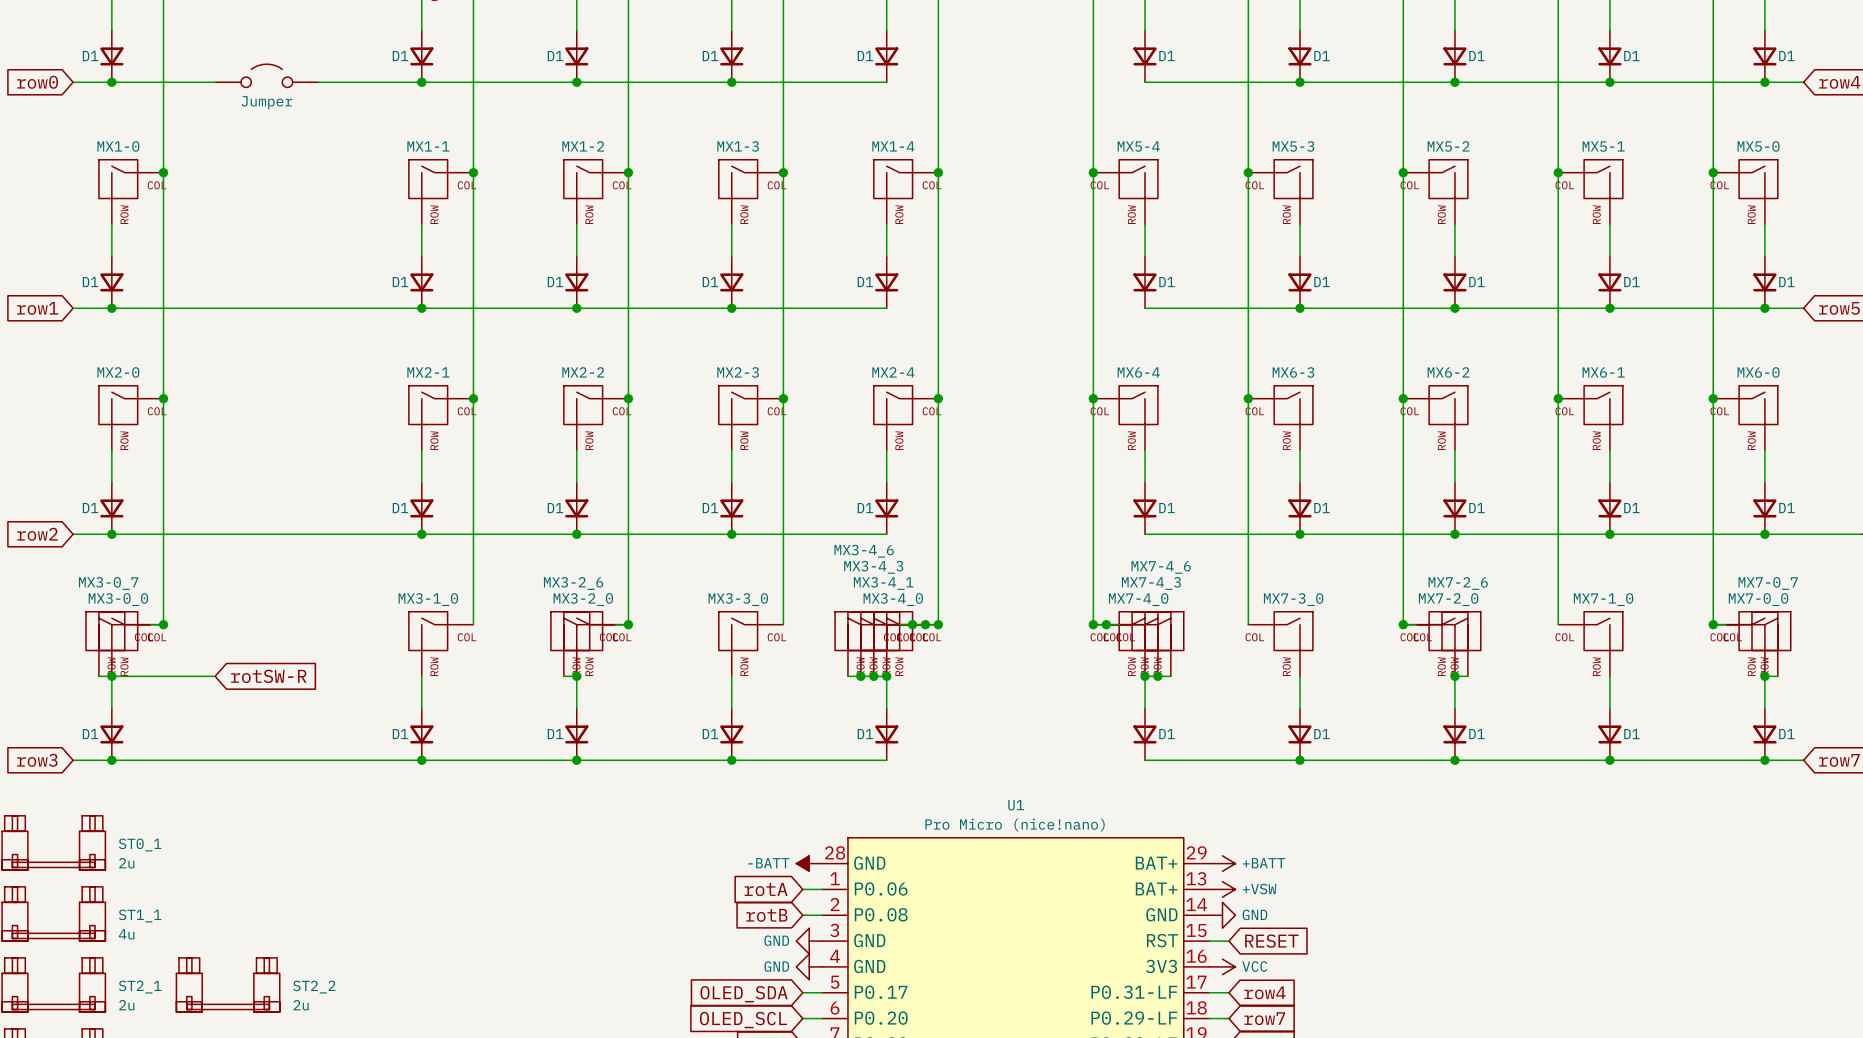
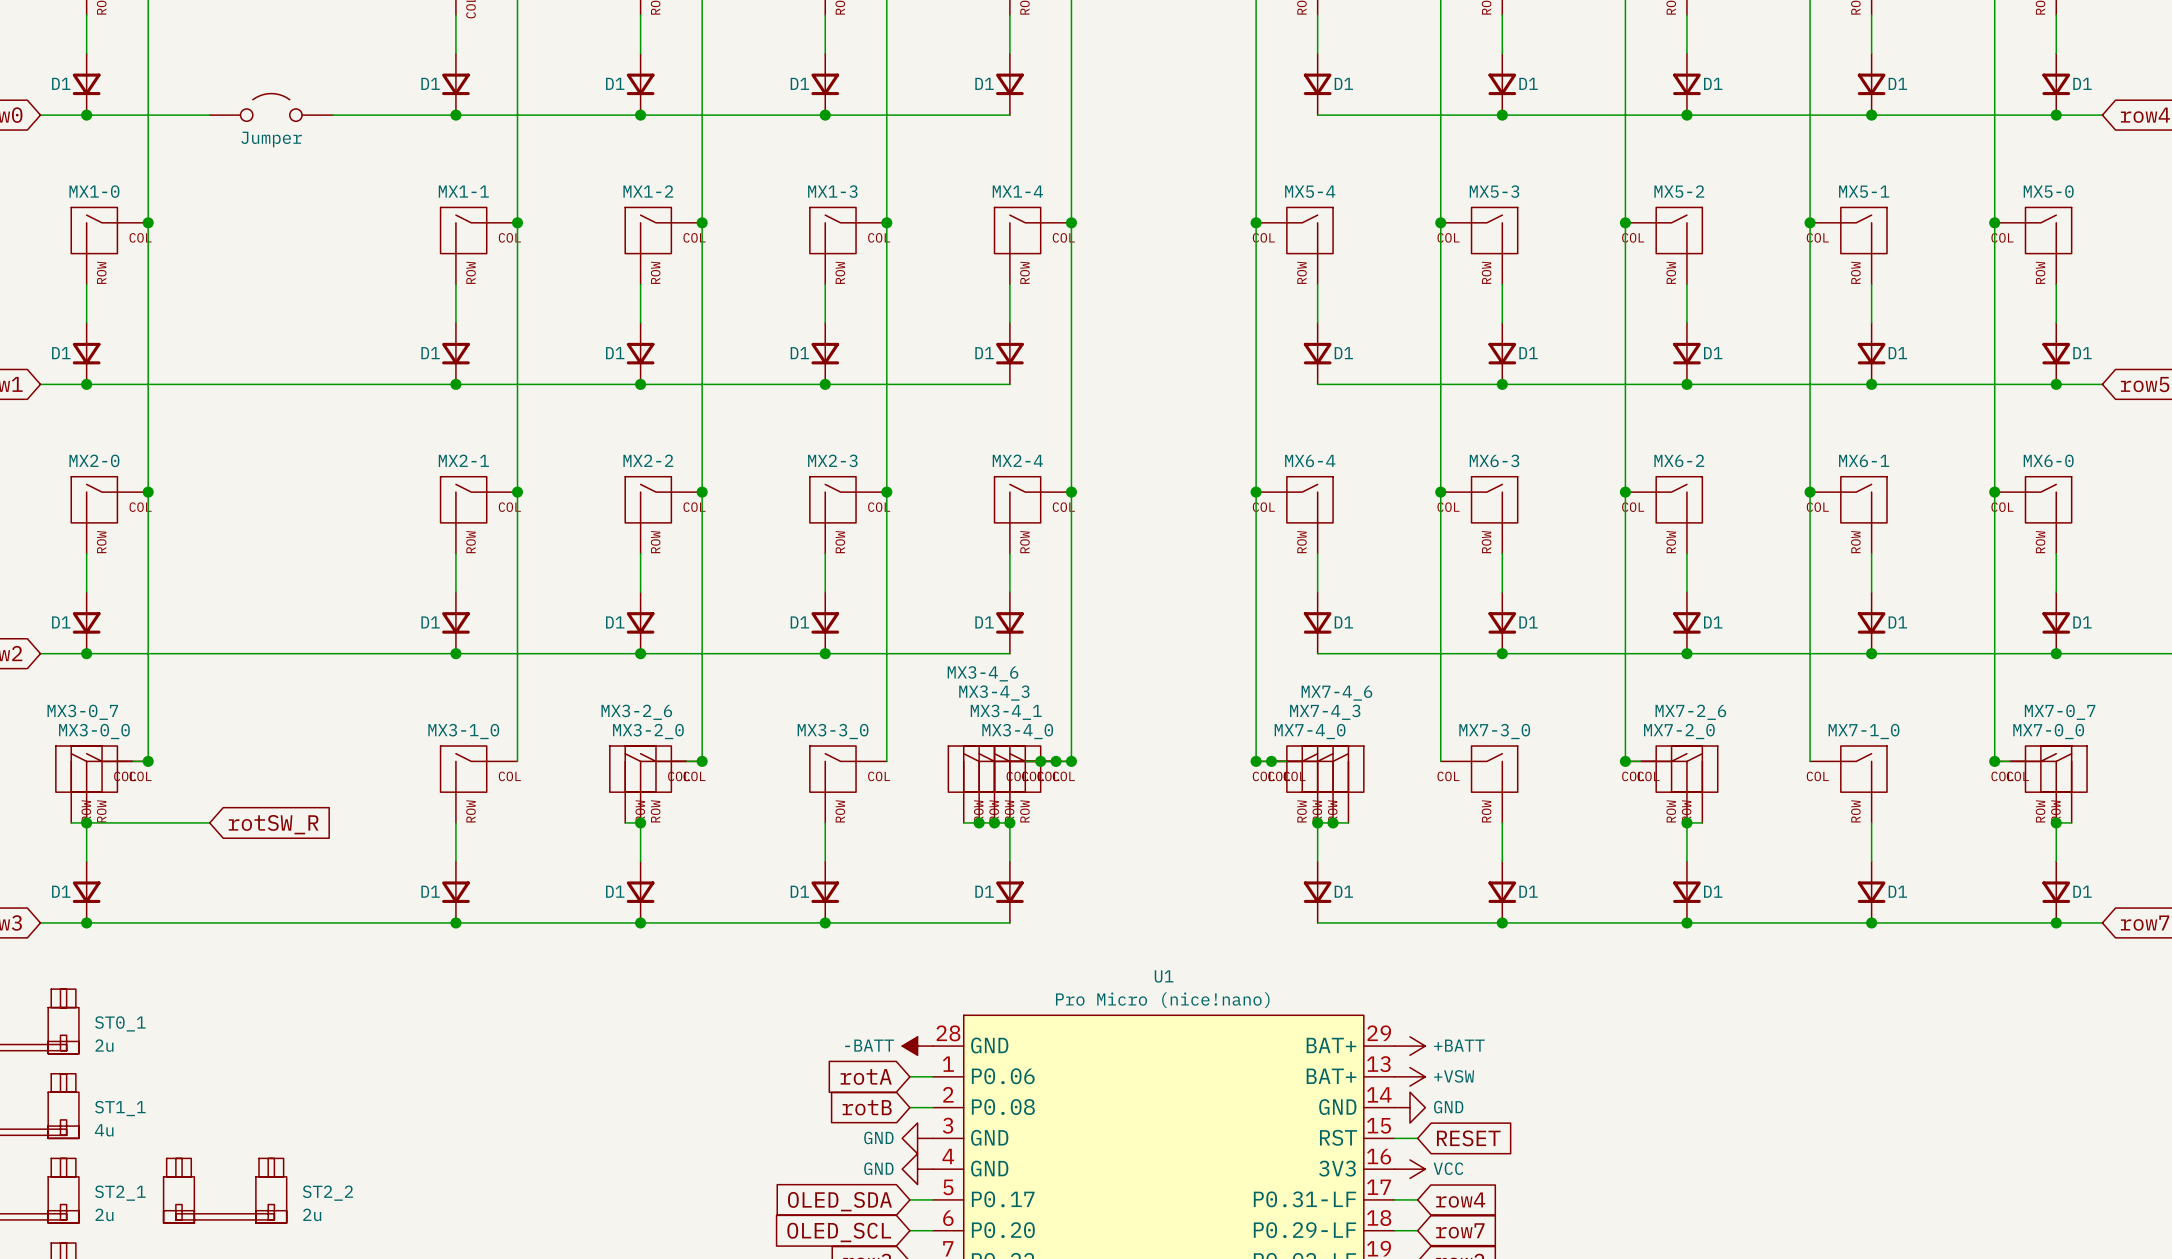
global label: rotSW-R (268, 676) -> rotSW_R (273, 824)

